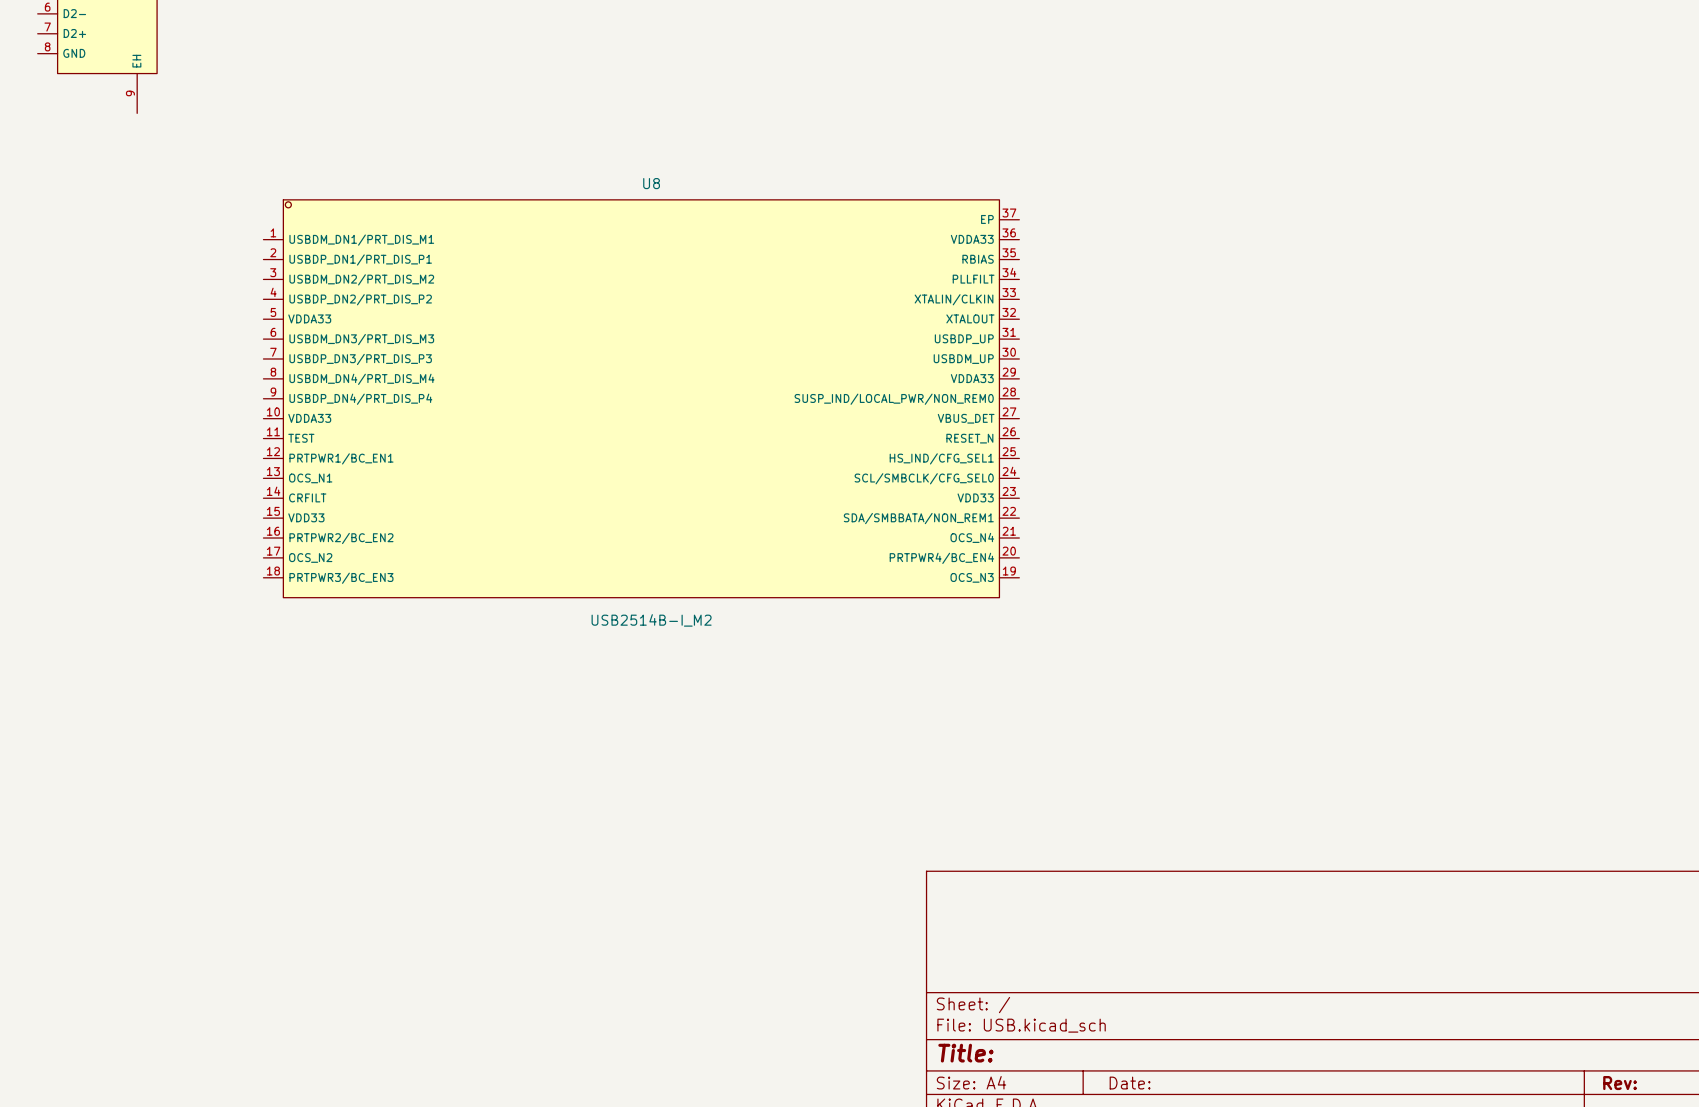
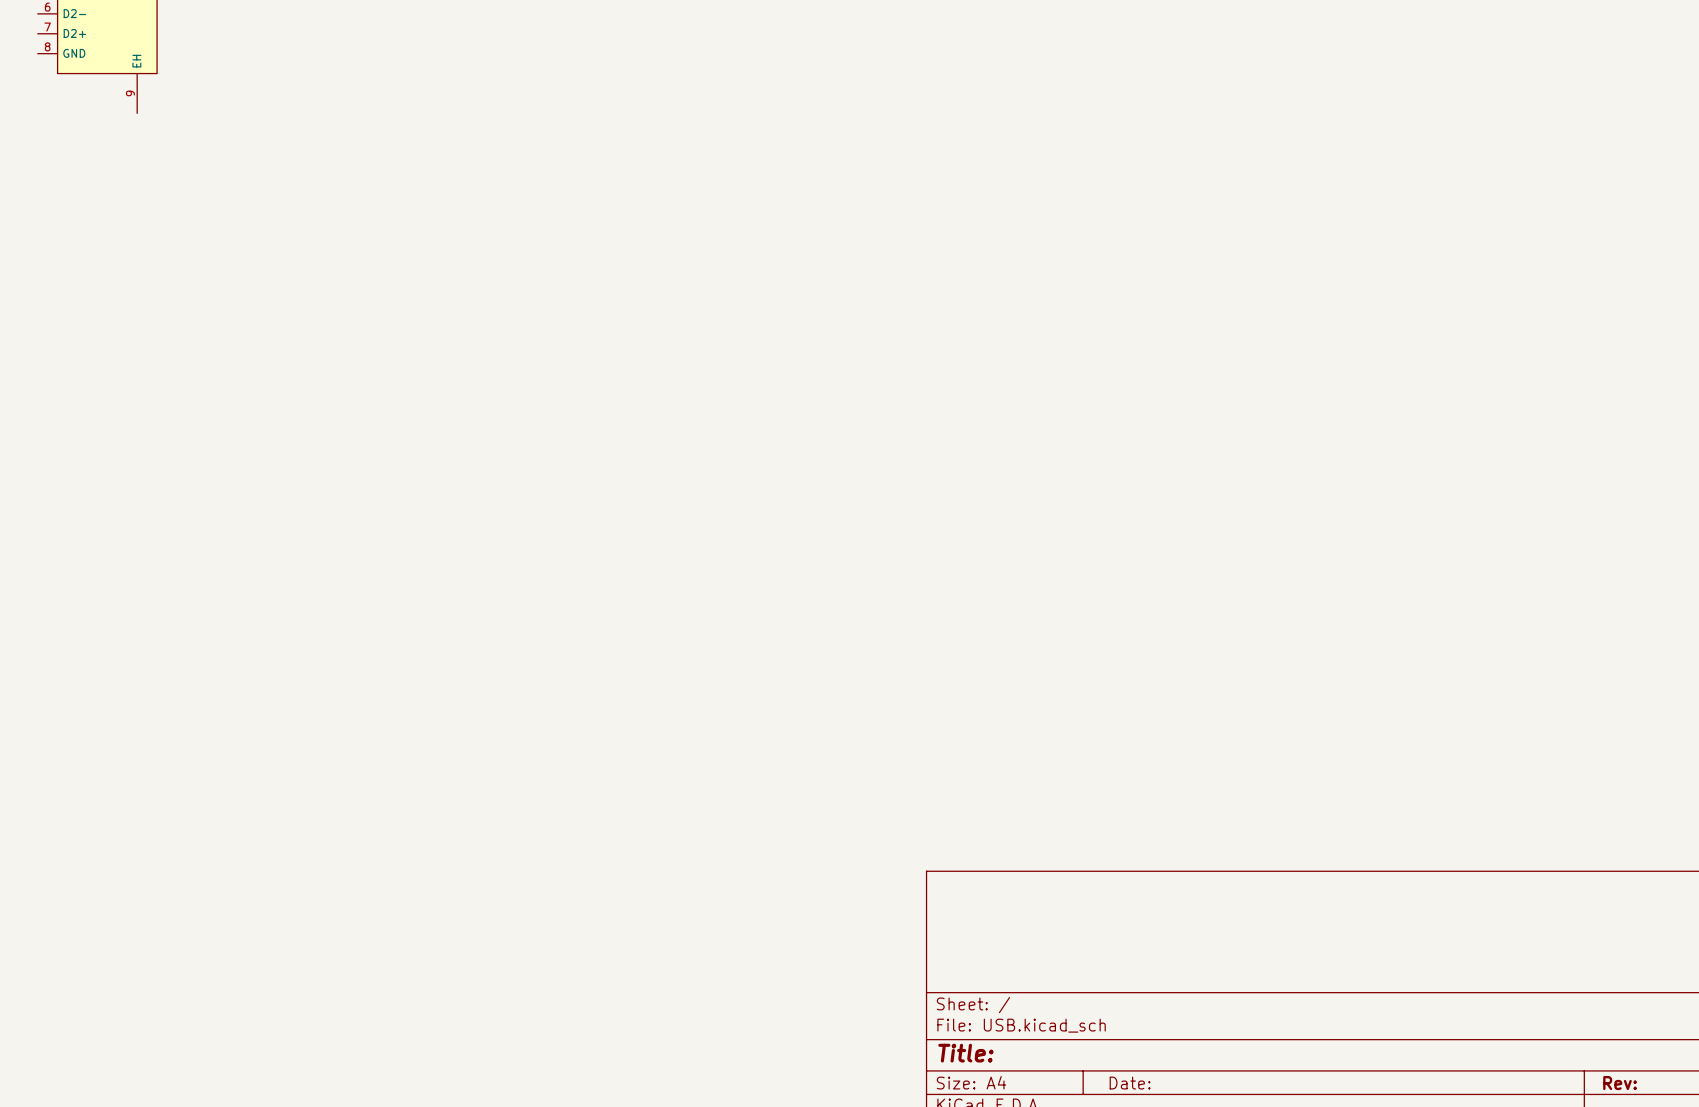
U8: USB2514B-I_M2 (641, 398) -> none

